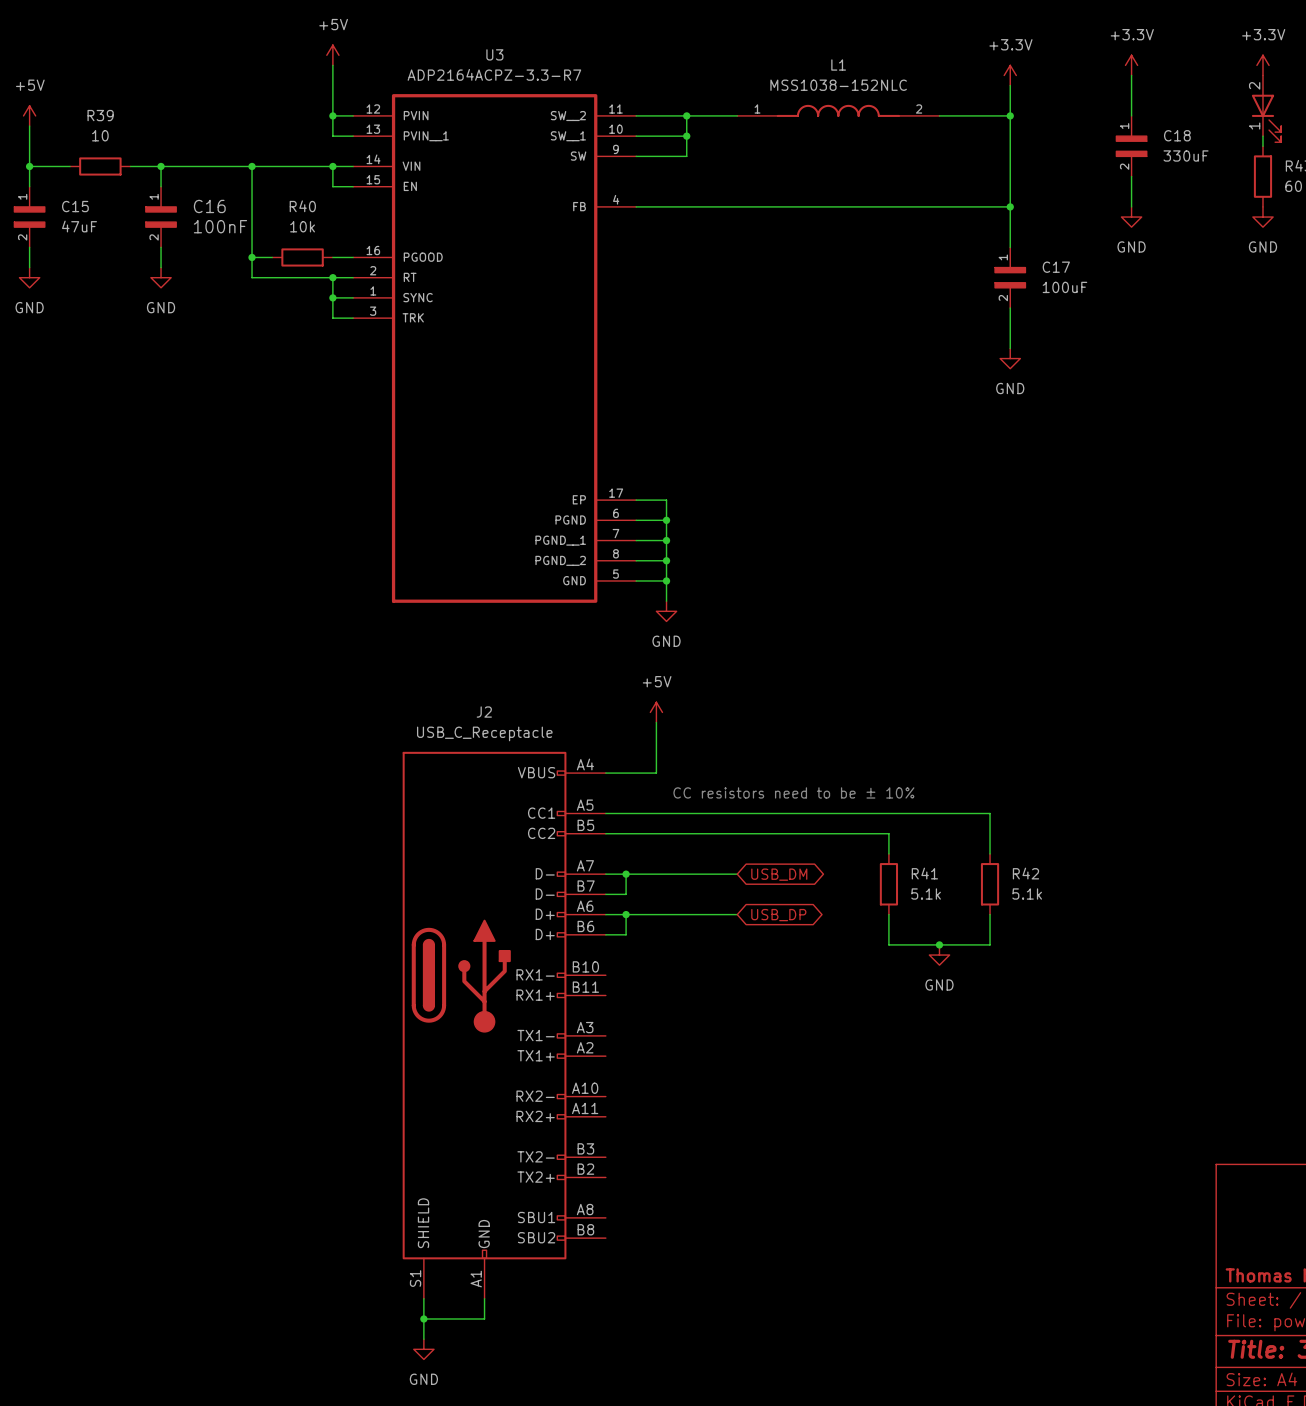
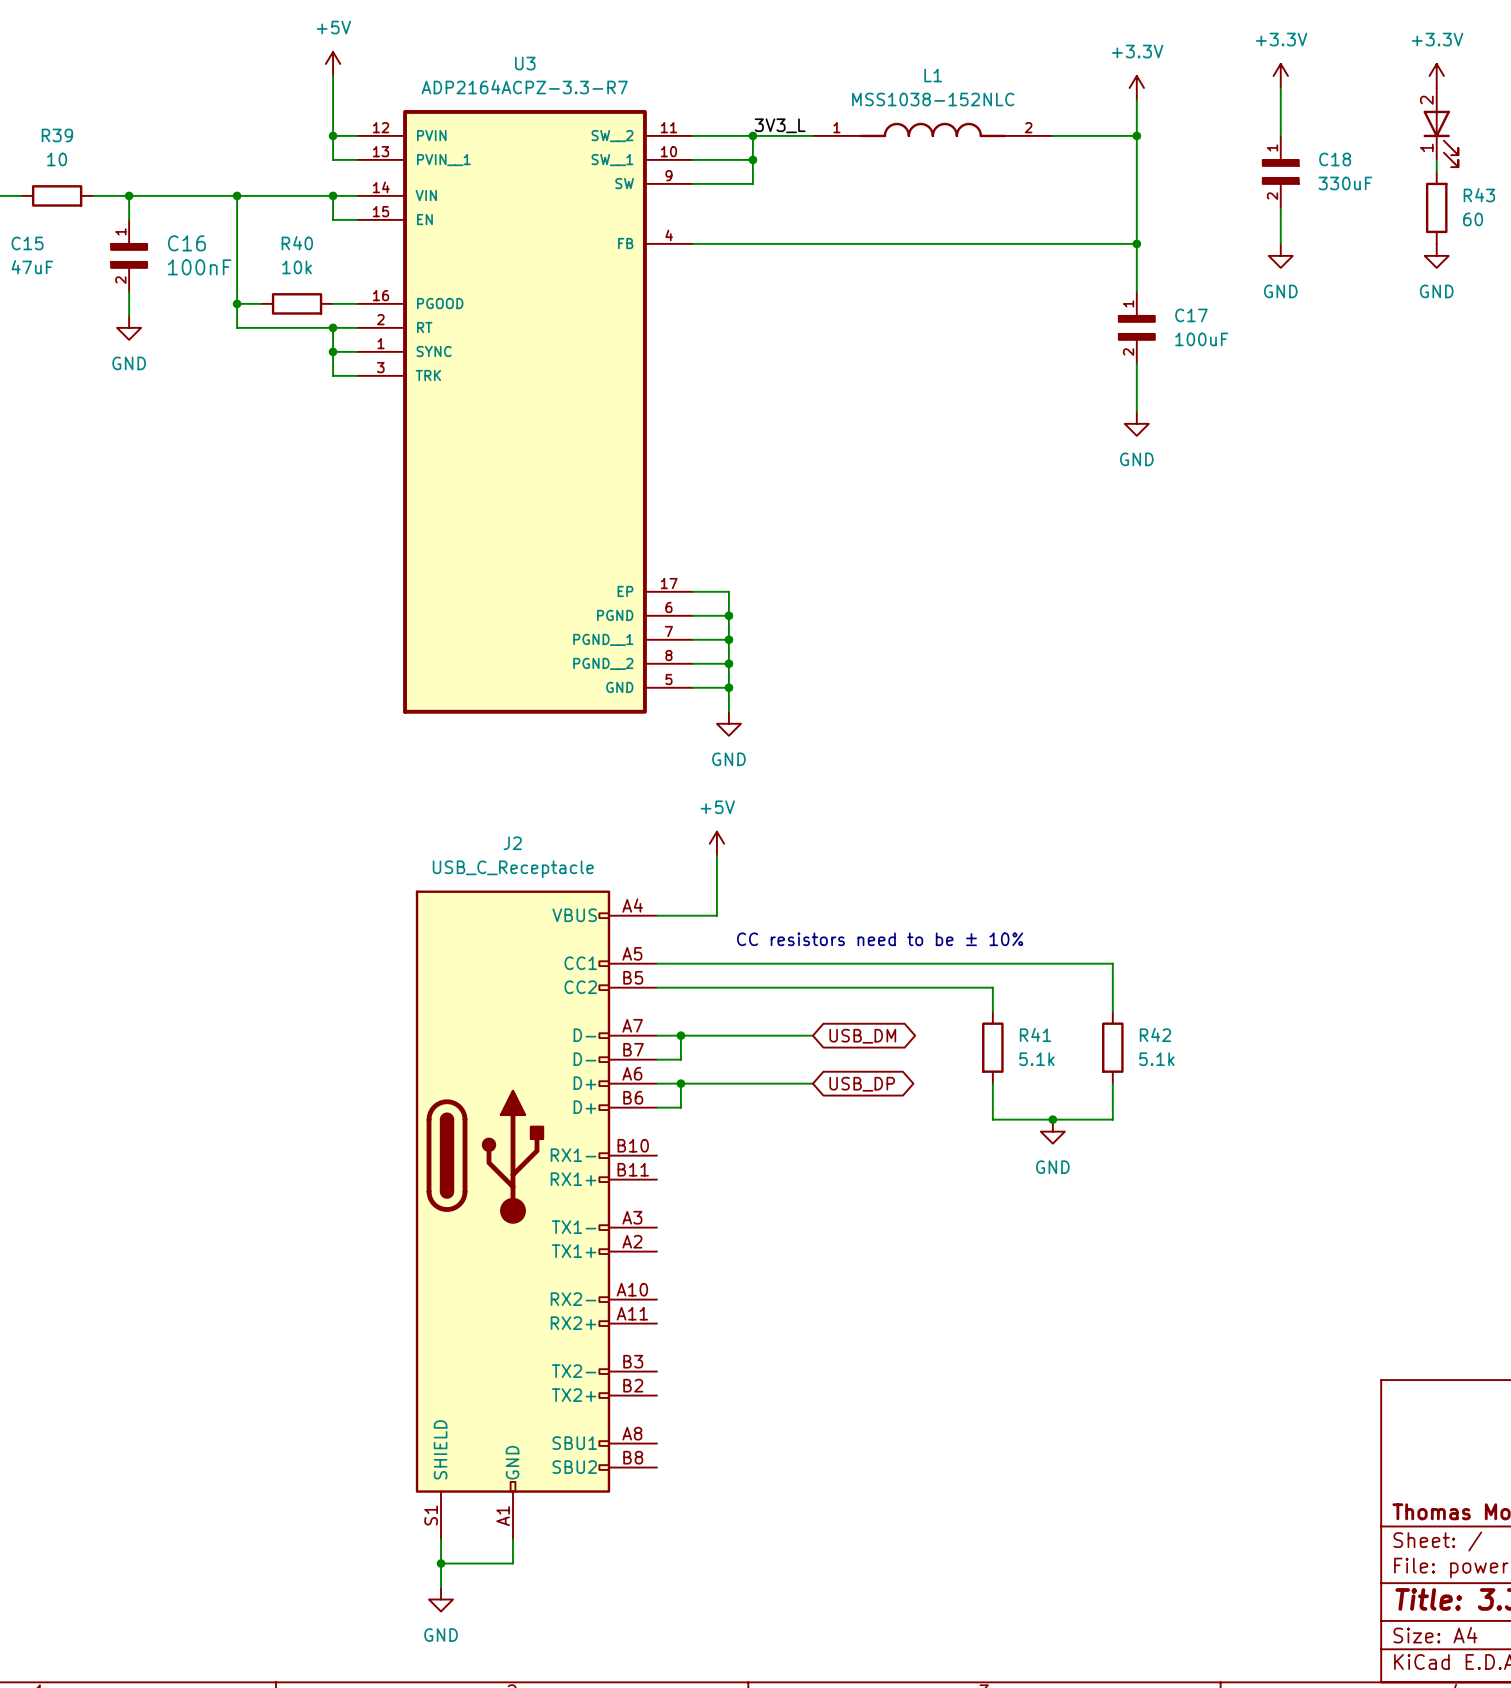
label: none -> 3V3_L (780, 125)

